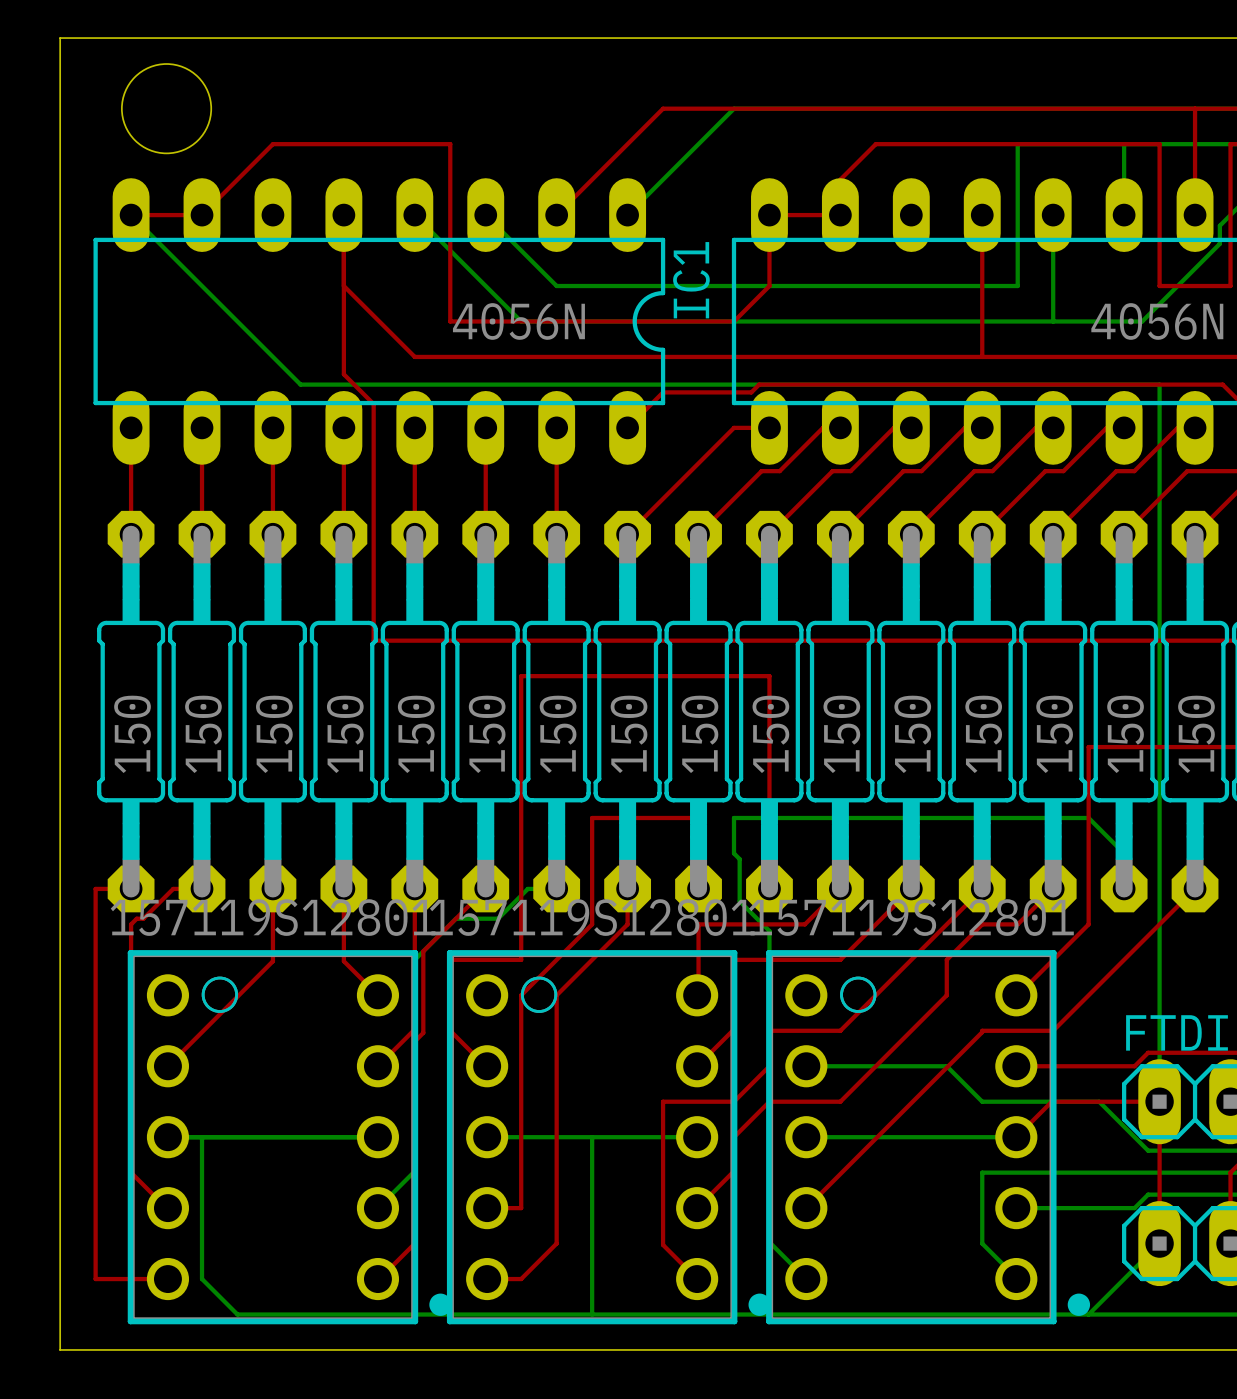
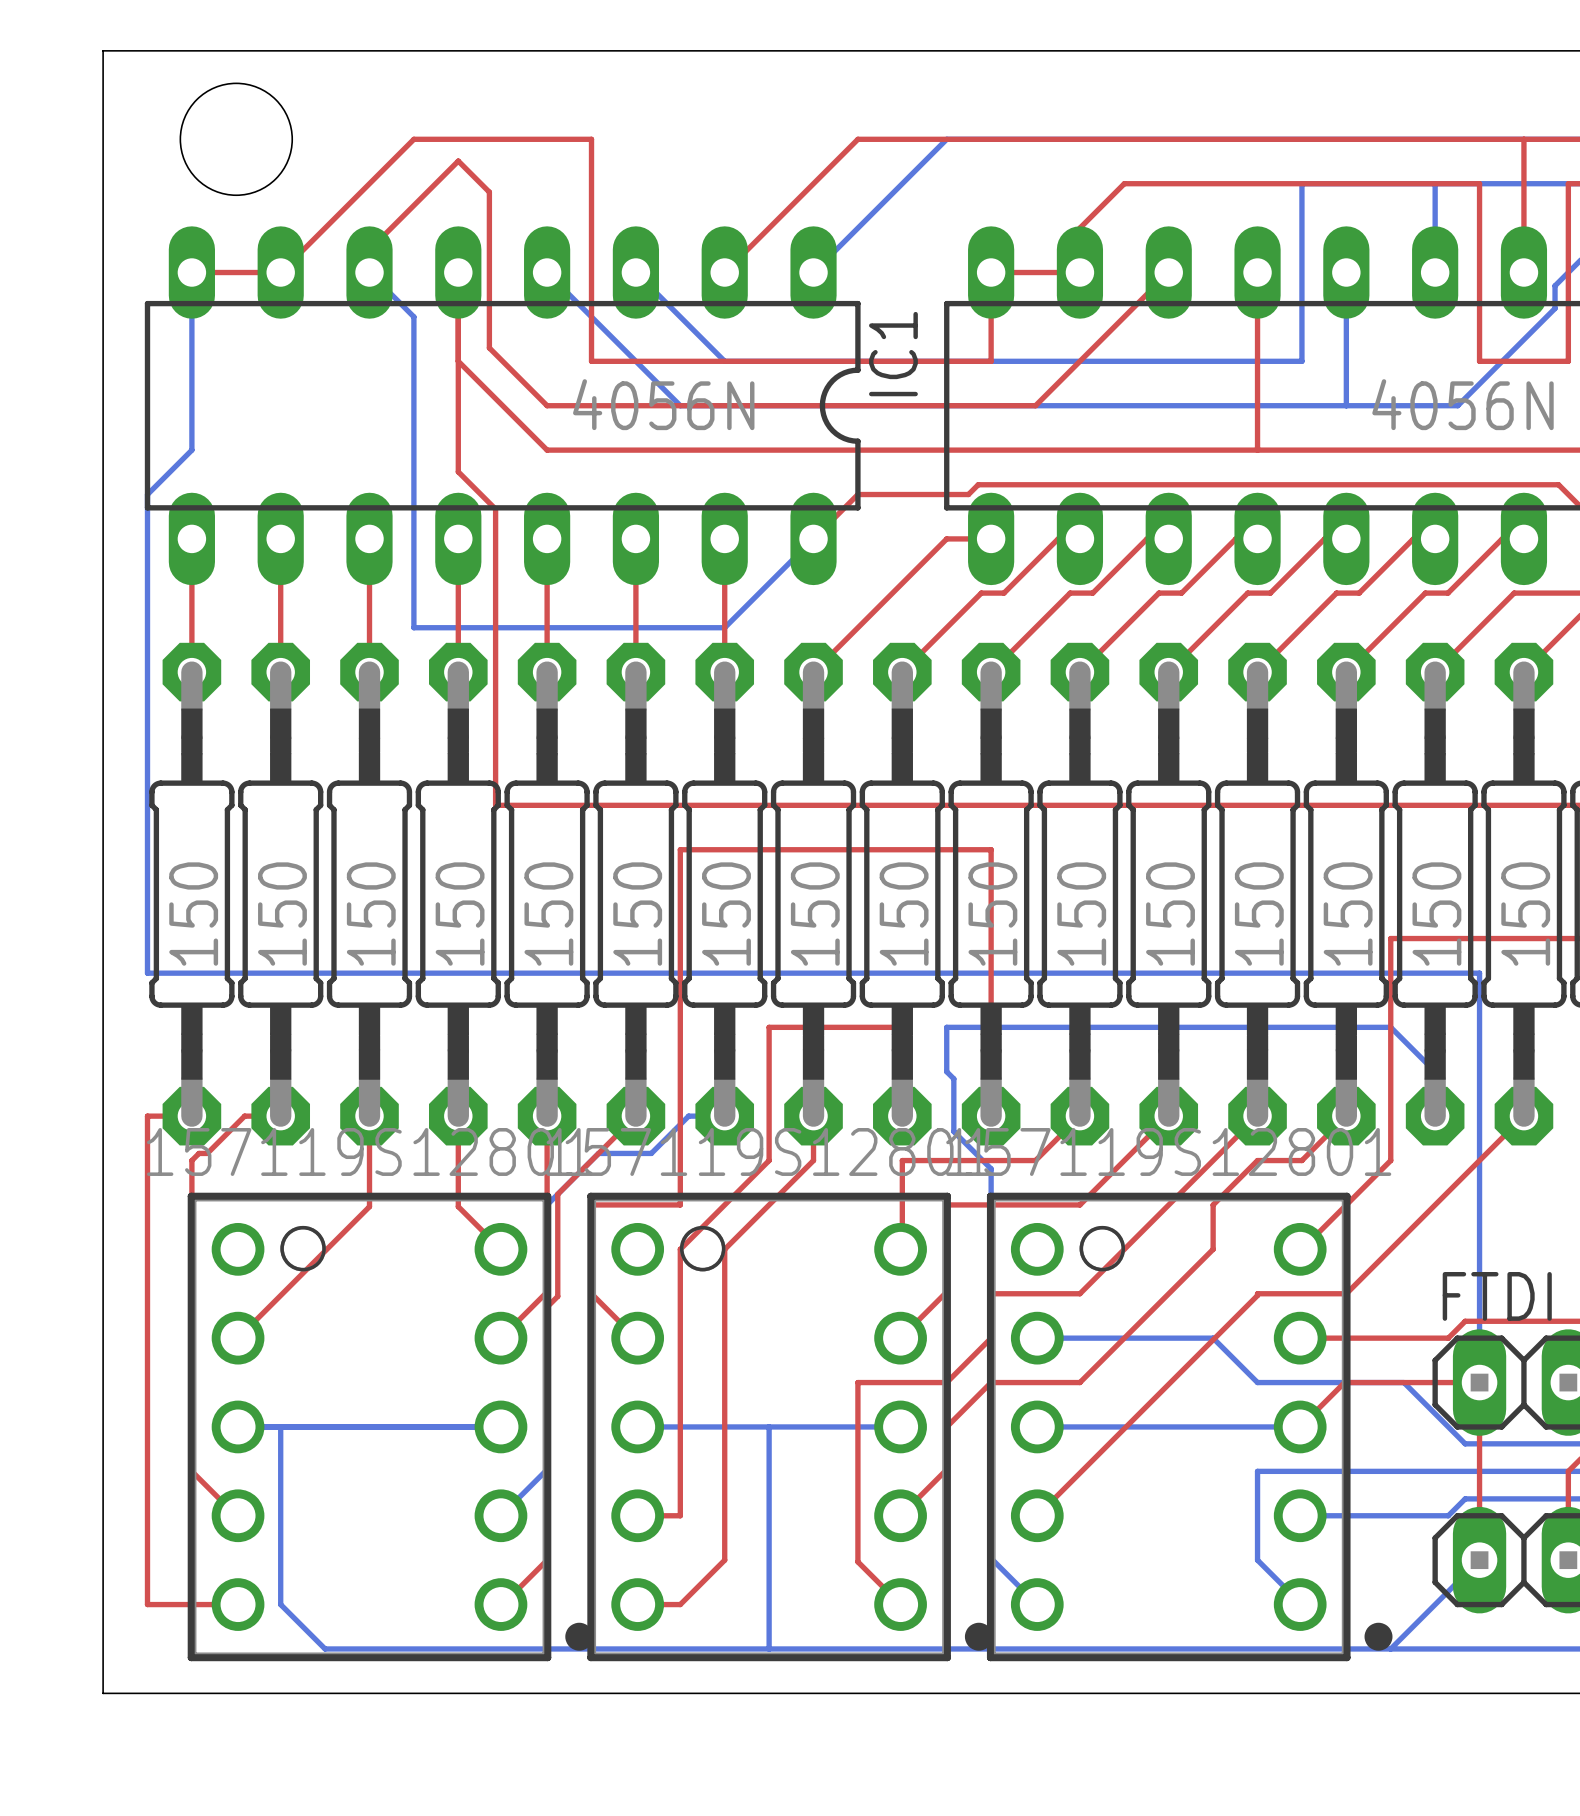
top track: (272, 144) (450, 144) -> (369, 183) (413, 139) (591, 139) (591, 183)
bottom track: (131, 215) (300, 384) (1159, 384) (1159, 774) -> (191, 272) (191, 450) (147, 494) (147, 973) (1479, 973)
bottom track: none -> (369, 272) (413, 316) (413, 627) (724, 627) (813, 538)
top track: (450, 286) (450, 321) -> (369, 272) (369, 249) (458, 161) (489, 192) (489, 347) (547, 405) (591, 405)
top track: none -> (591, 361) (991, 361)
top track: (769, 286) (734, 321) -> (1168, 272) (1035, 405) (946, 405)

